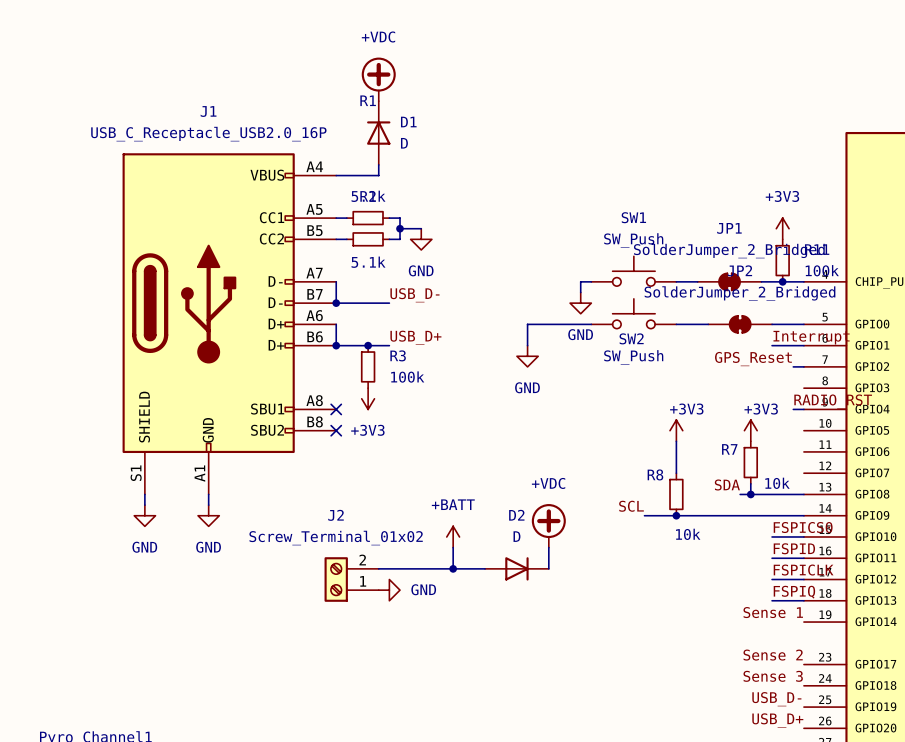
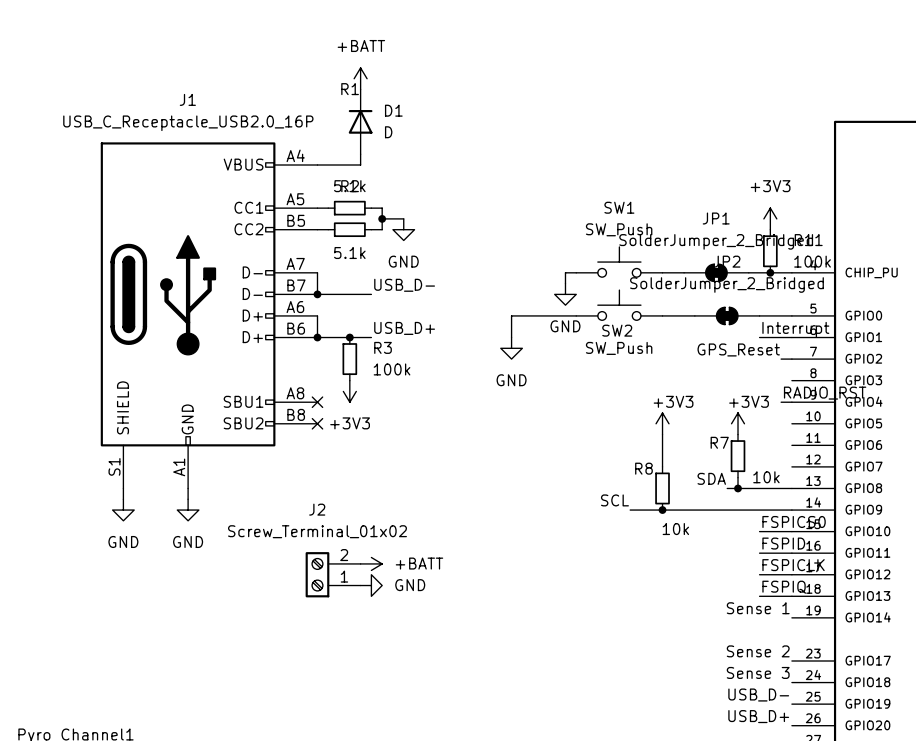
power symbol: +VDC (378, 79) -> none
power symbol: none -> +BATT (360, 78)
power symbol text position: +BATT (453, 504) -> +BATT (419, 563)
power symbol: +VDC (548, 525) -> none
power symbol rotation: 0° (453, 536) -> 90° clockwise (371, 563)
power symbol position: +BATT (453, 536) -> +BATT (371, 563)
wire: (453, 547) (453, 568) -> none
wire: (548, 547) (548, 568) -> none
wire: (378, 568) (485, 568) -> none
junction: (453, 568) -> none
D2: D (516, 568) -> none

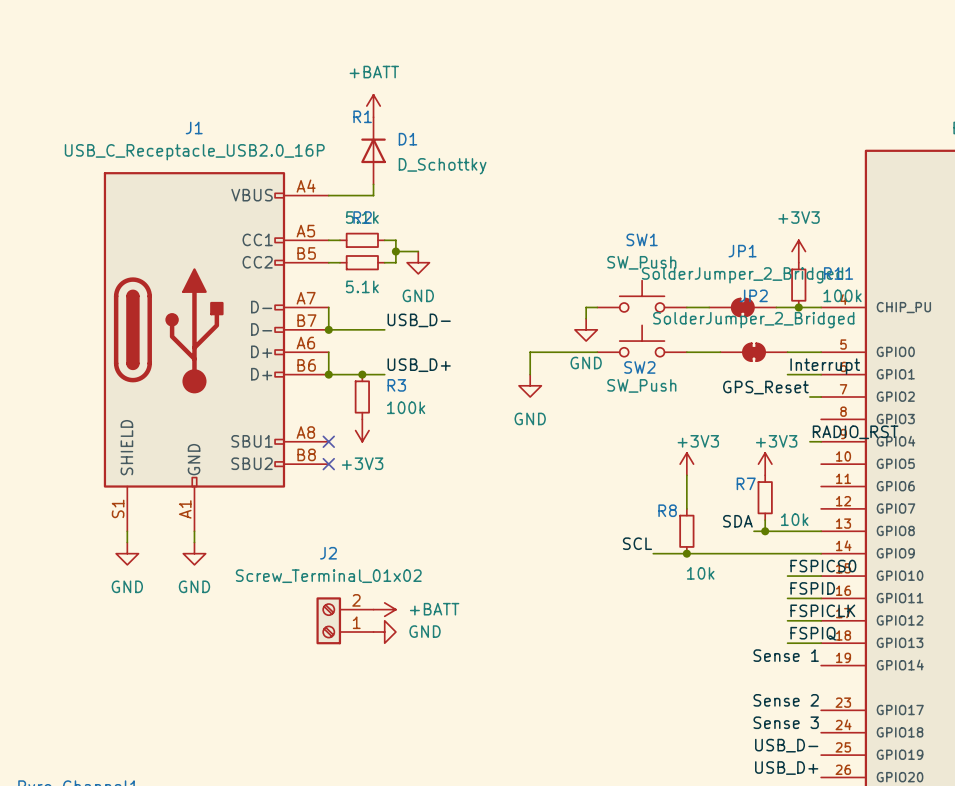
D1 value: D (388, 132) -> D_Schottky (442, 166)

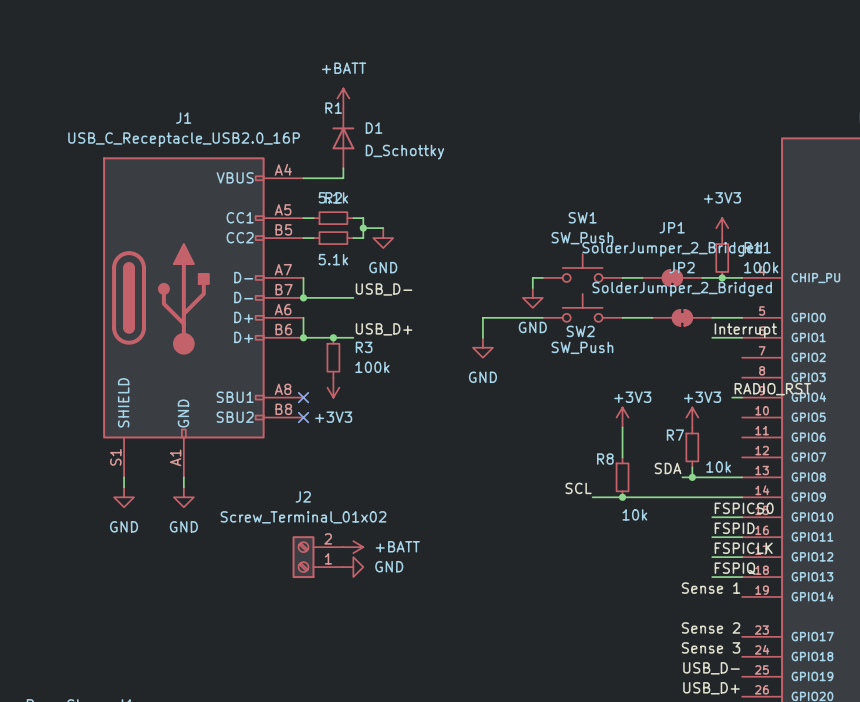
label: GPS_Reset (765, 387) -> none
wire: (809, 397) (821, 397) -> none

